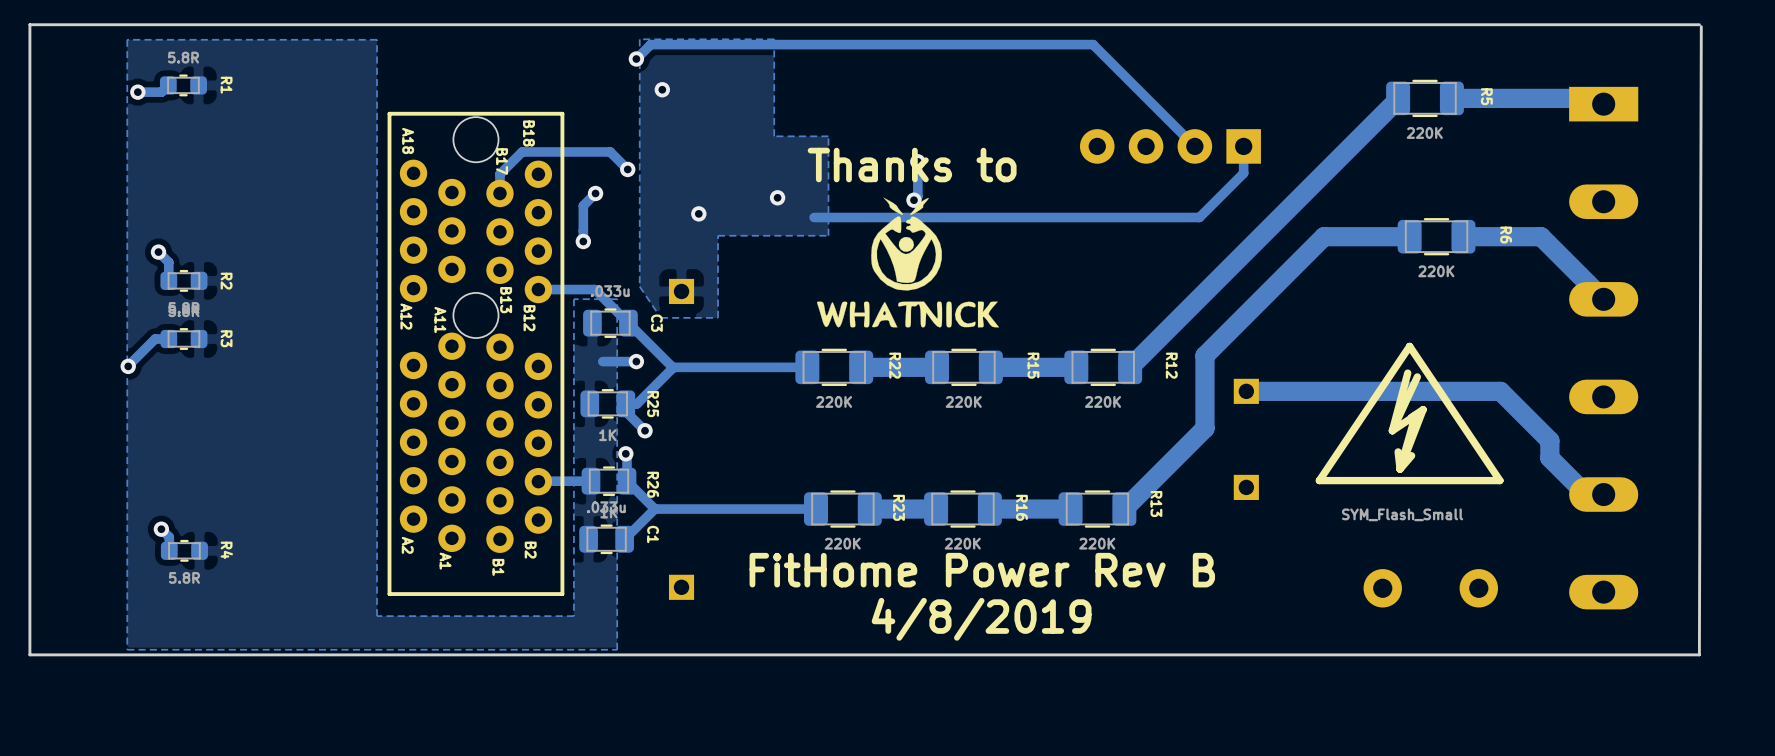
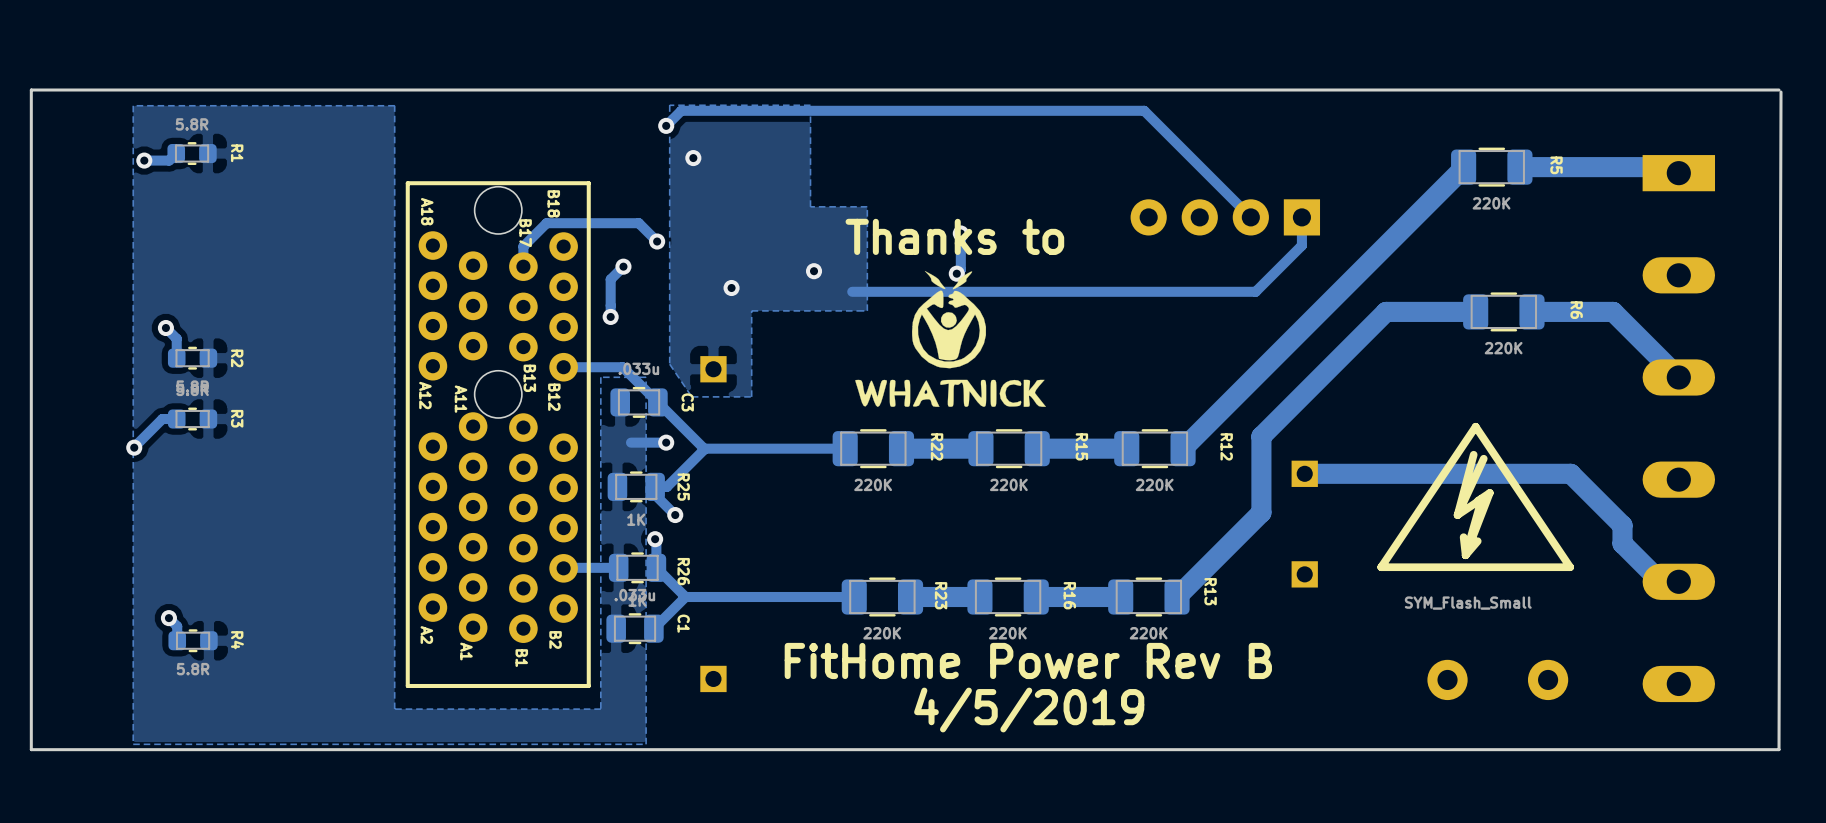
text: 4/8/2019 (981, 619) -> 4/5/2019 (1029, 710)

